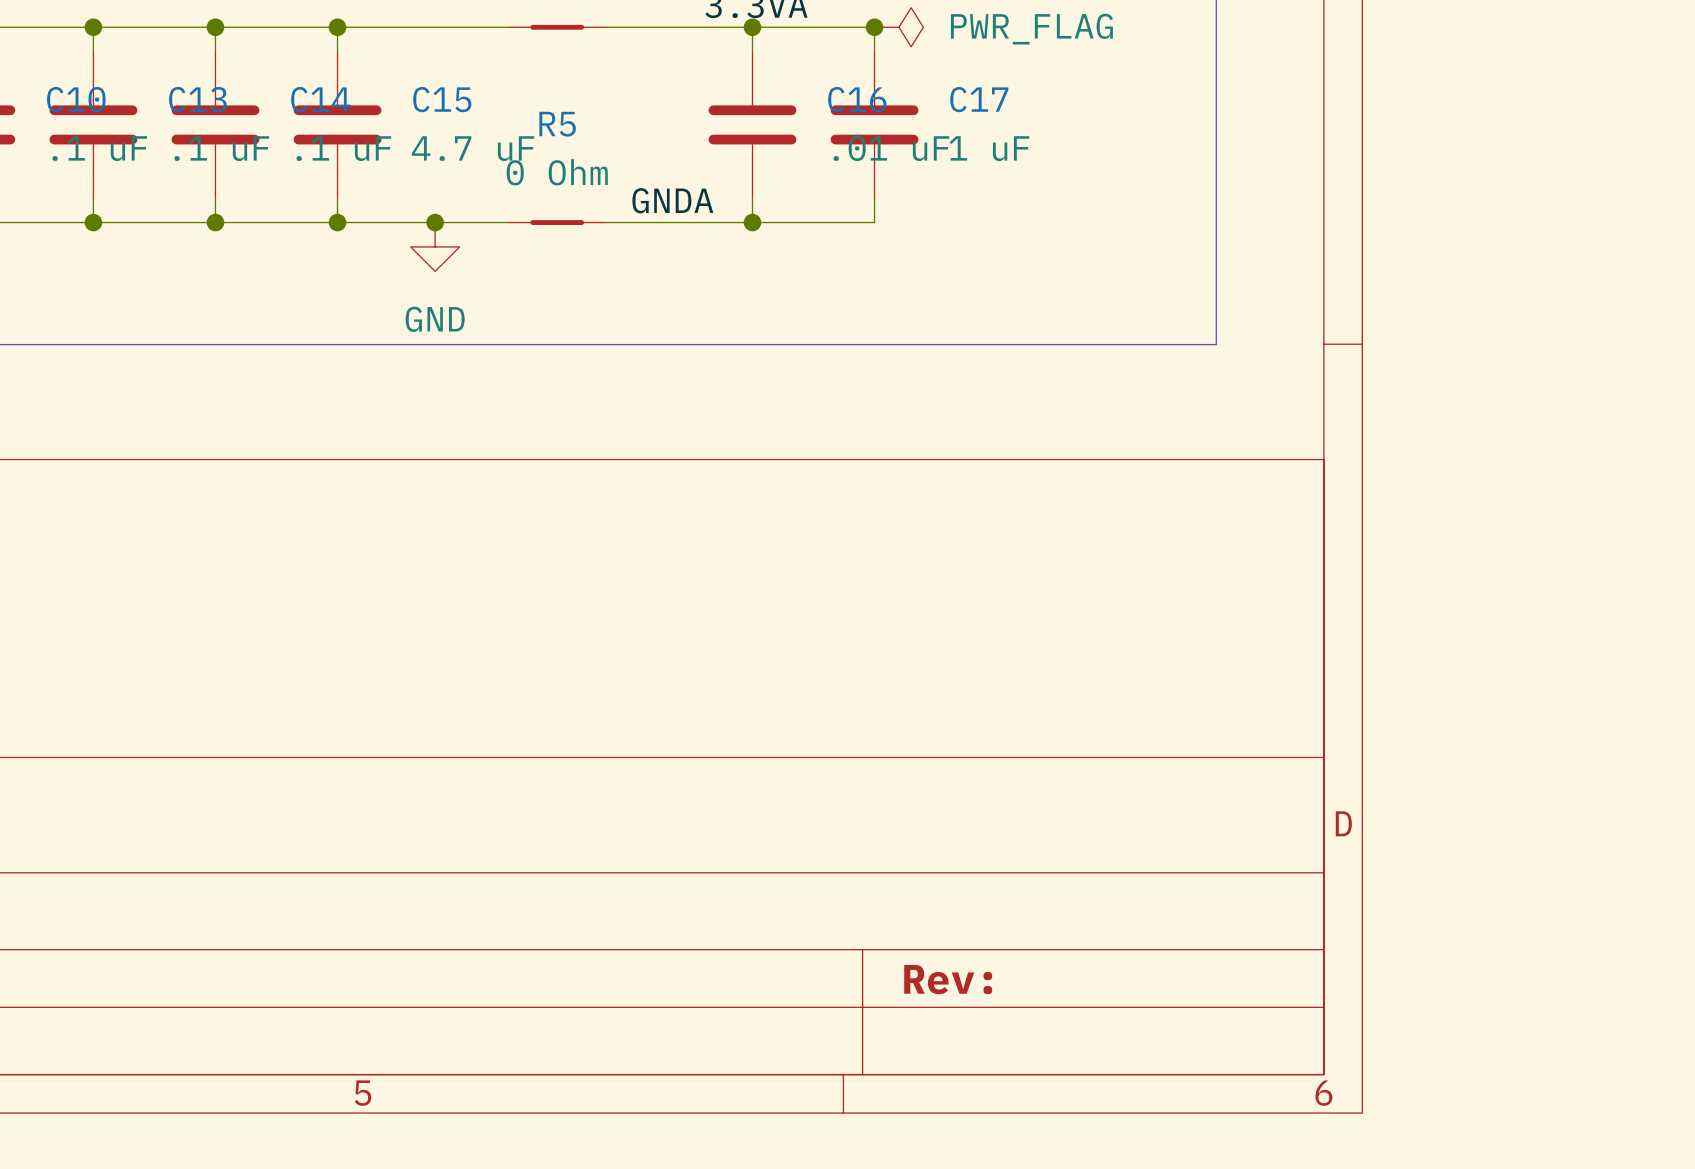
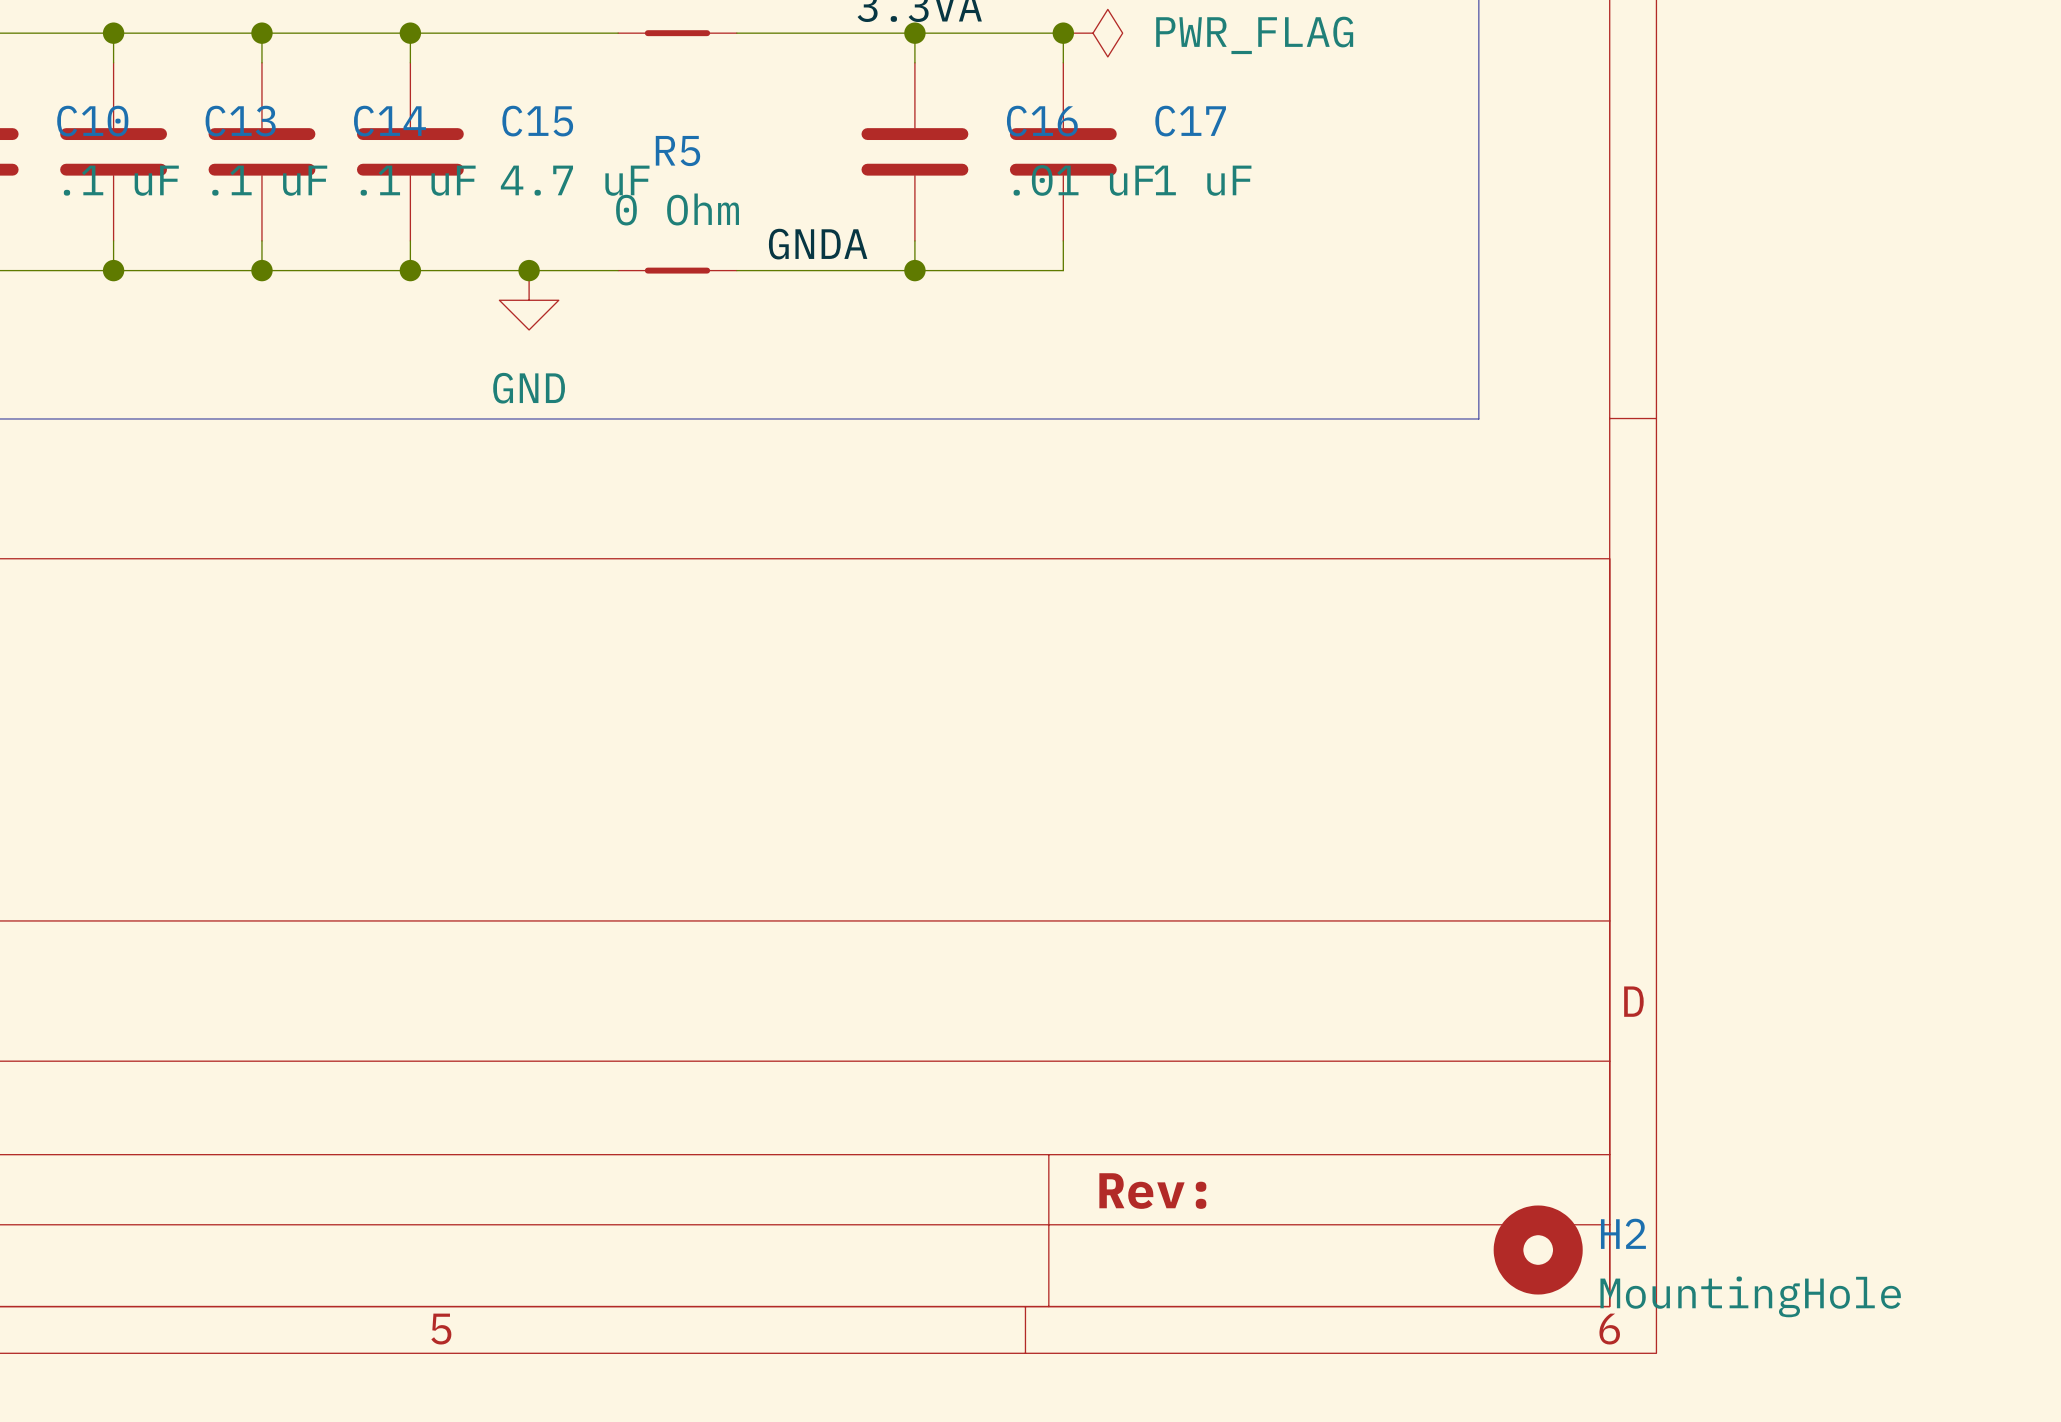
H2: none -> MountingHole (1538, 1250)

